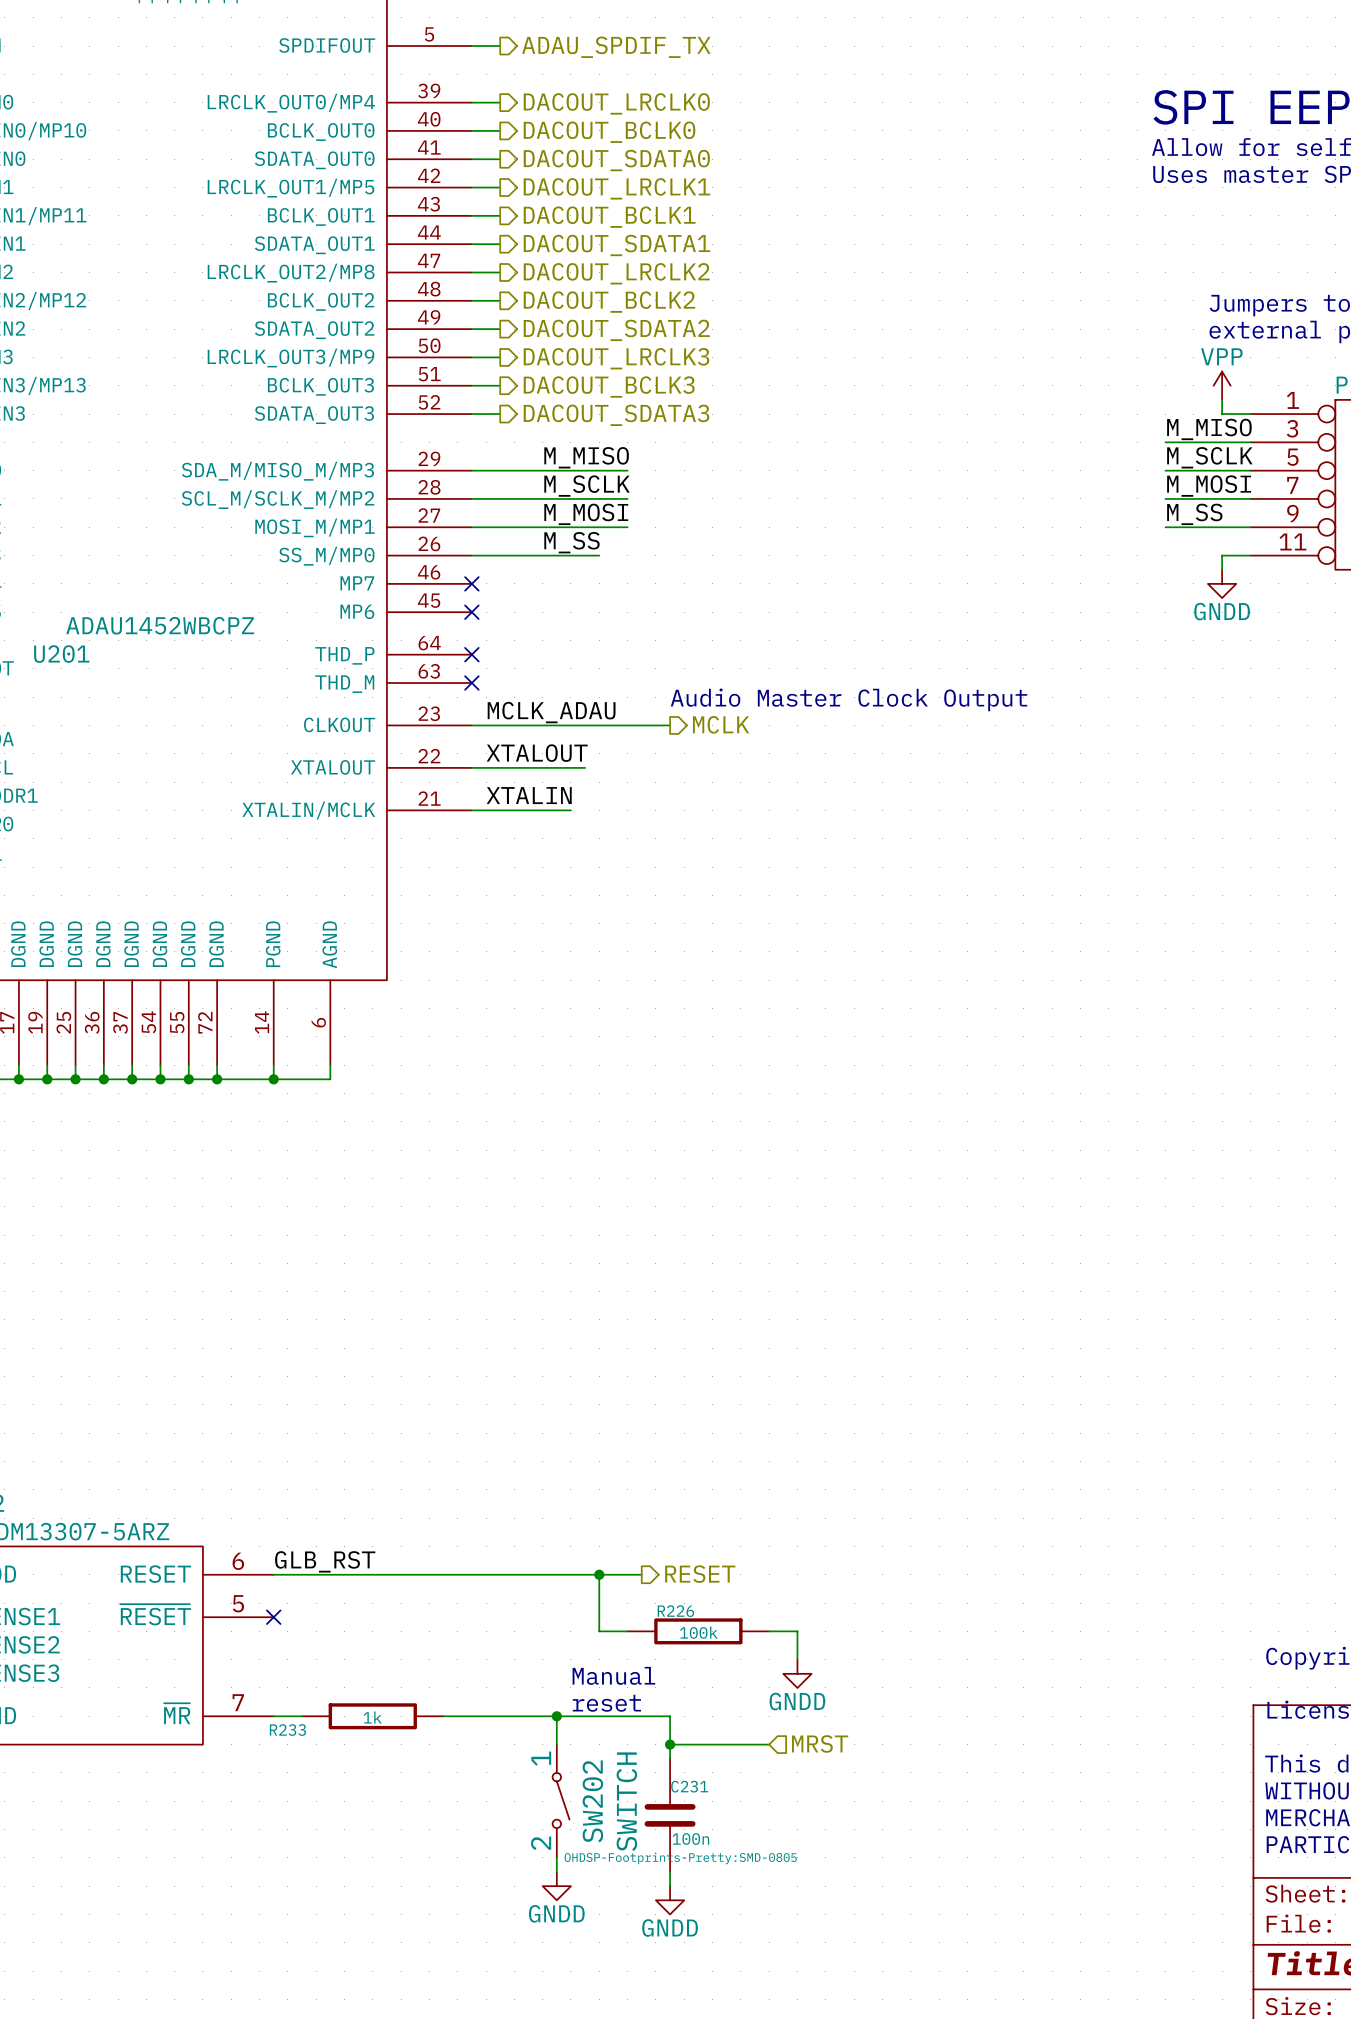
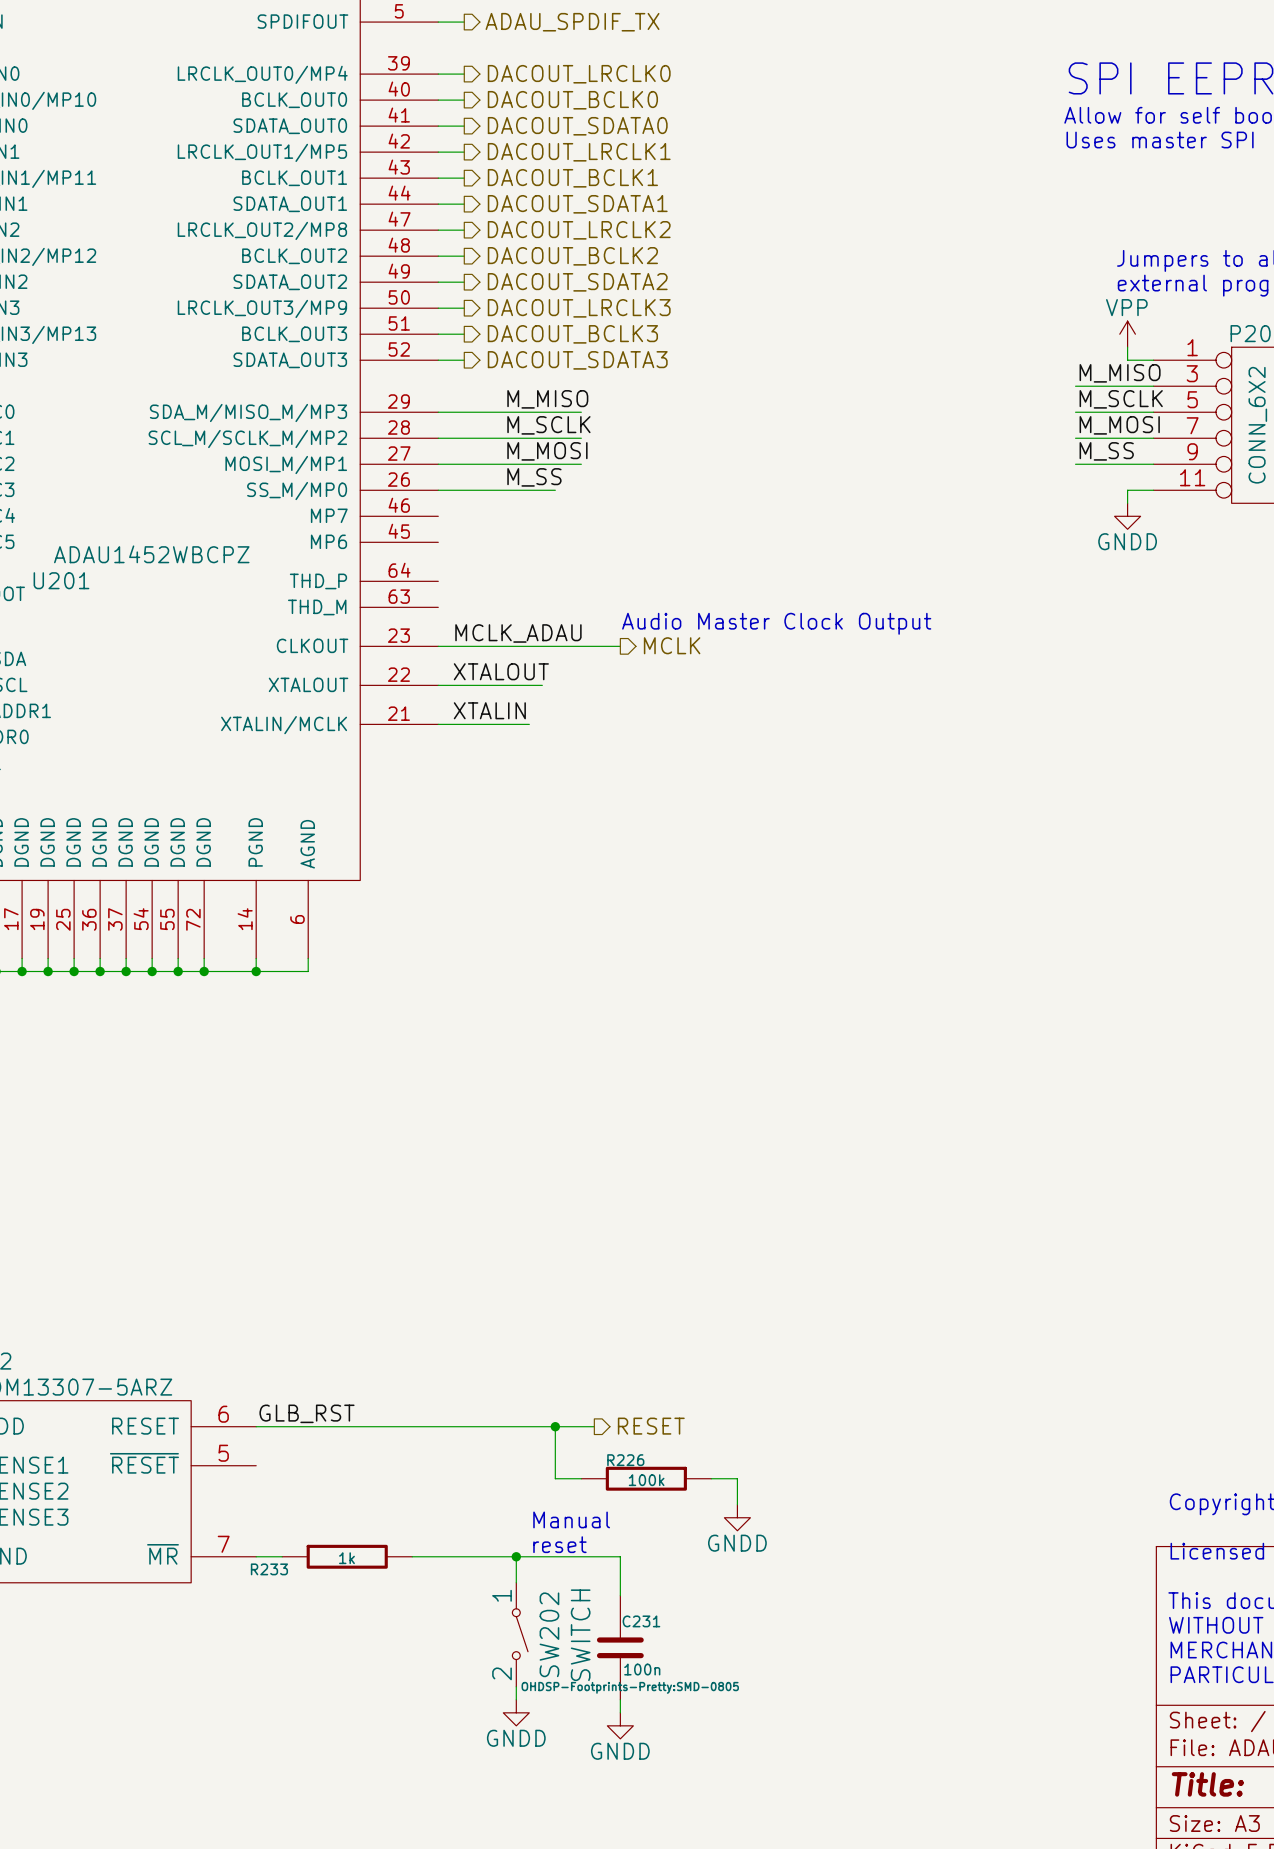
no-connect mark: (471, 583) -> none
no-connect mark: (471, 612) -> none
no-connect mark: (471, 654) -> none
no-connect mark: (471, 682) -> none
no-connect mark: (273, 1617) -> none
hierarchical label: MRST (820, 1743) -> none
wire: (670, 1744) (769, 1744) -> none
junction: (670, 1744) -> none

